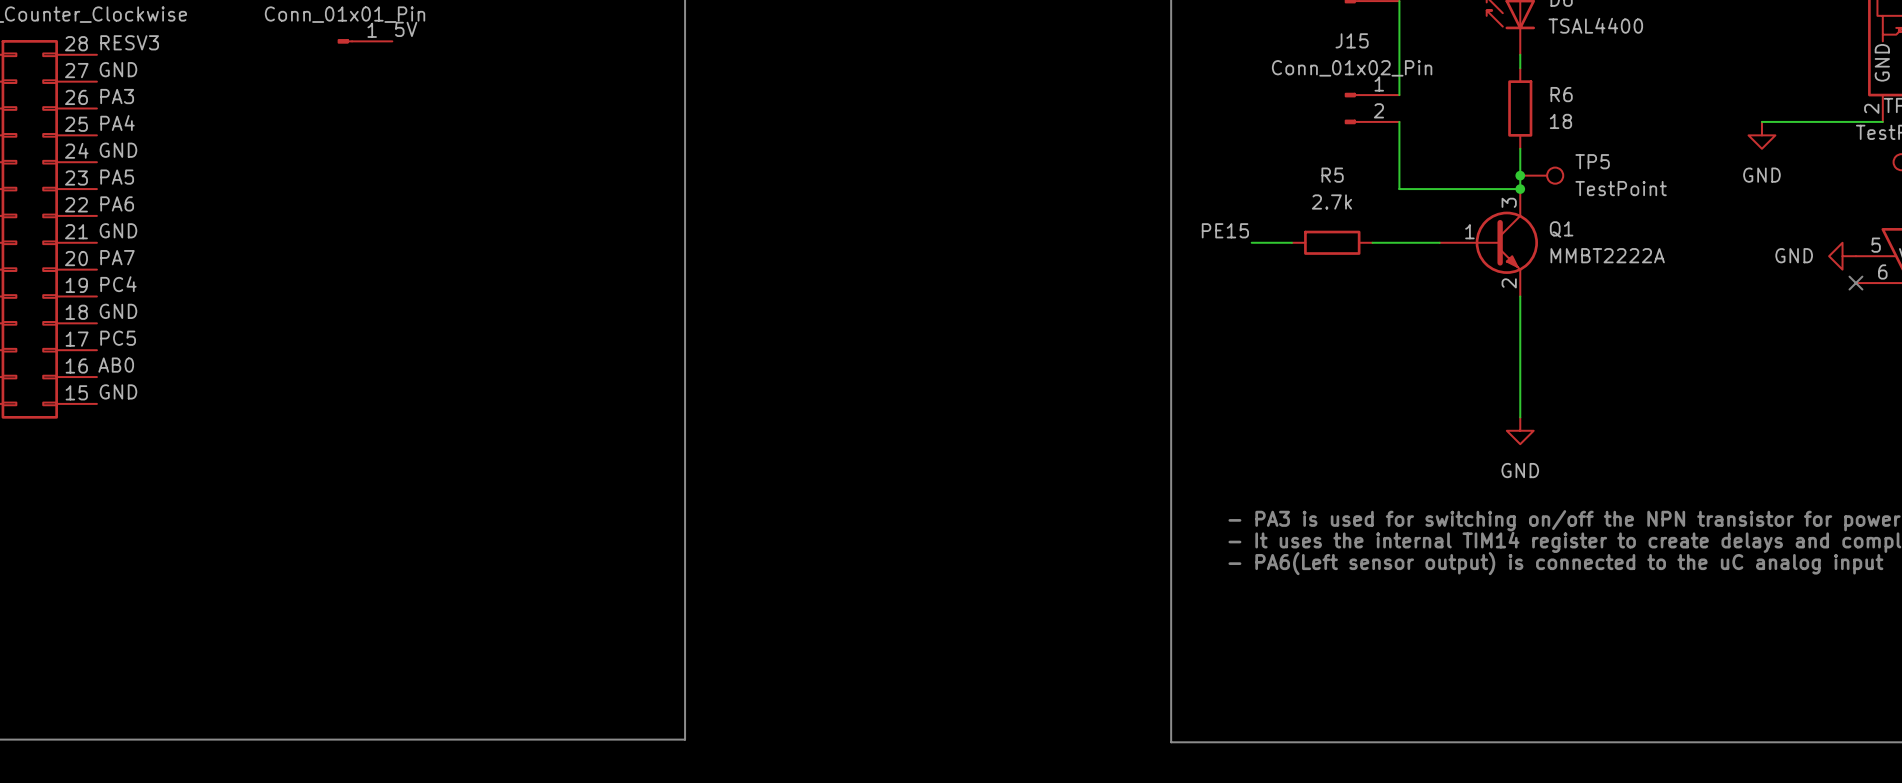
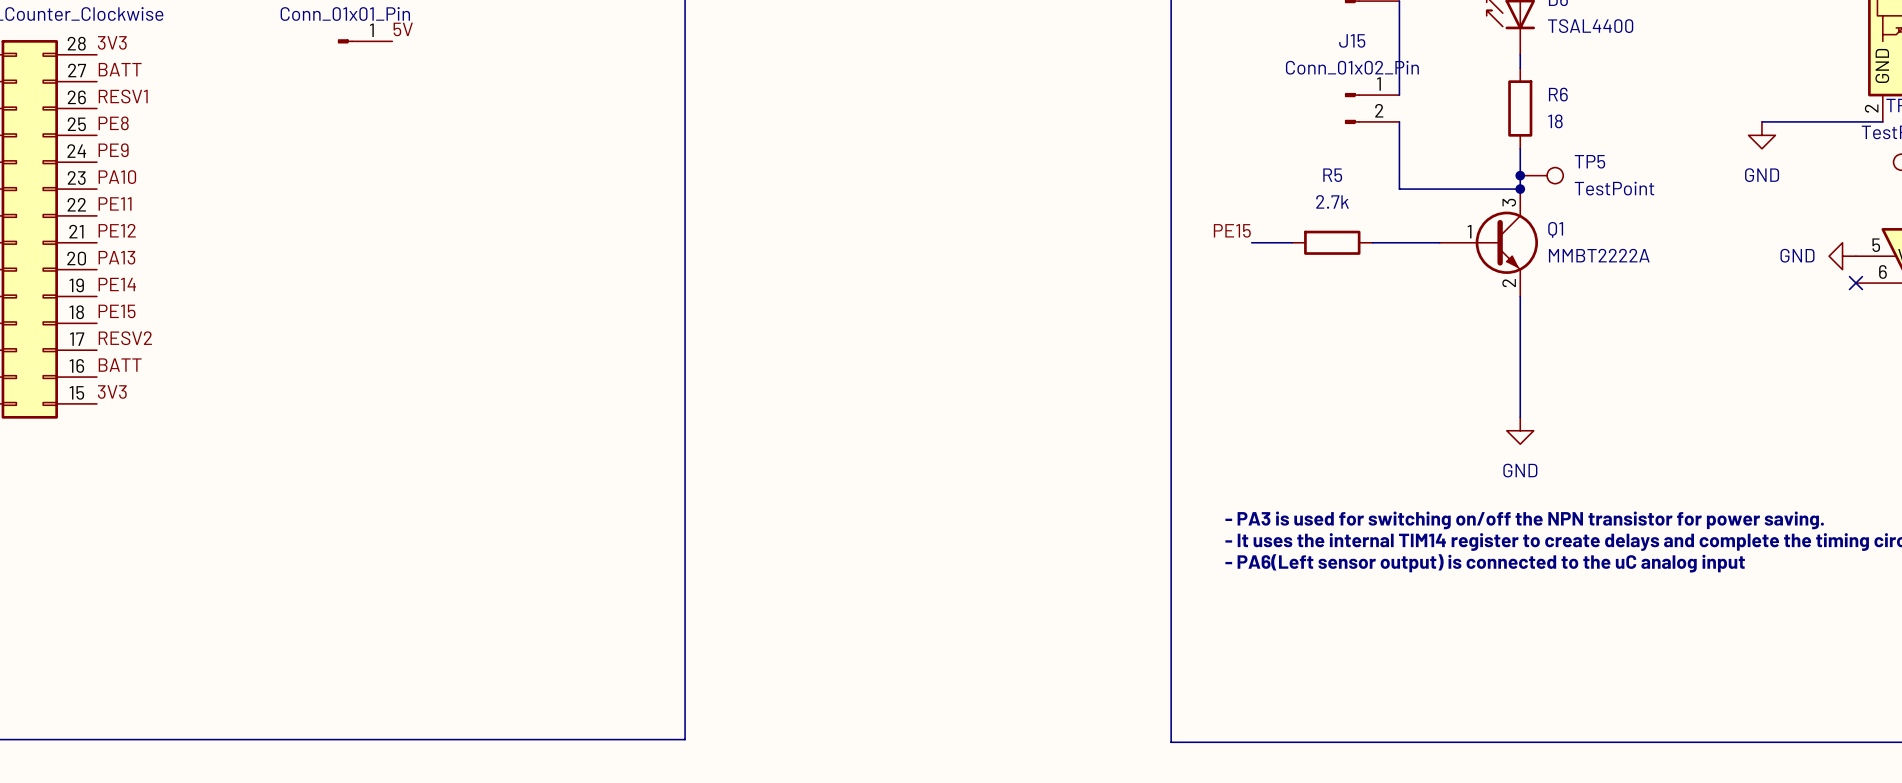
label: RESV3 (129, 42) -> 3V3 (112, 42)
label: GND (118, 69) -> BATT (120, 69)
label: PA3 (117, 96) -> RESV1 (123, 96)
label: PA4 (117, 123) -> PE8 (113, 123)
label: GND (118, 150) -> PE9 (113, 150)
label: PA5 (117, 177) -> PA10 (117, 177)
label: PA6 (117, 203) -> PE11 (115, 203)
label: GND (118, 230) -> PE12 (117, 230)
label: PA7 (117, 257) -> PA13 (116, 257)
label: PC4 (118, 284) -> PE14 (117, 284)
label: GND (118, 311) -> PE15 (117, 311)
label: PC5 (118, 338) -> RESV2 (125, 338)
label: AB0 (116, 365) -> BATT (120, 365)
label: GND (118, 391) -> 3V3 (112, 392)

